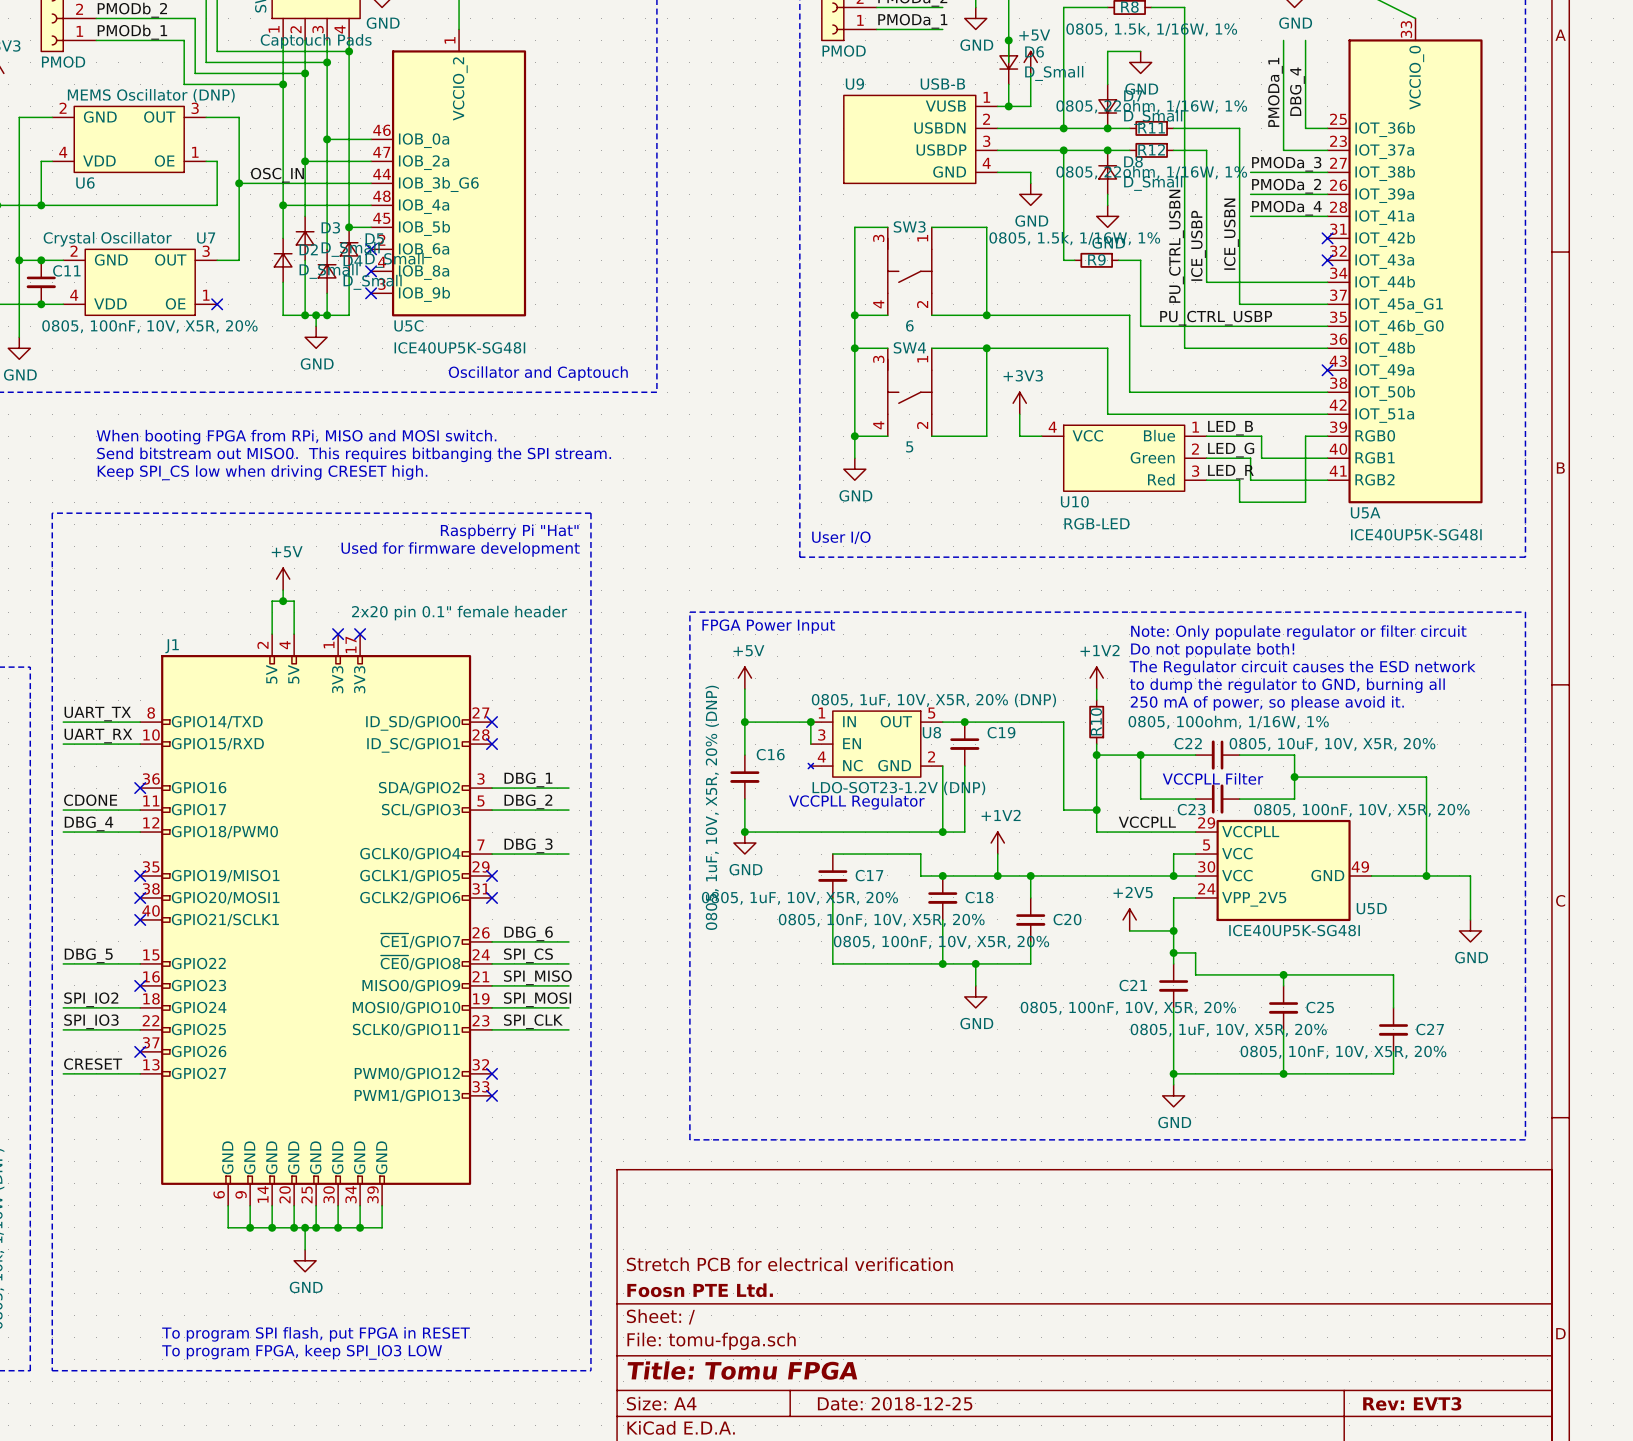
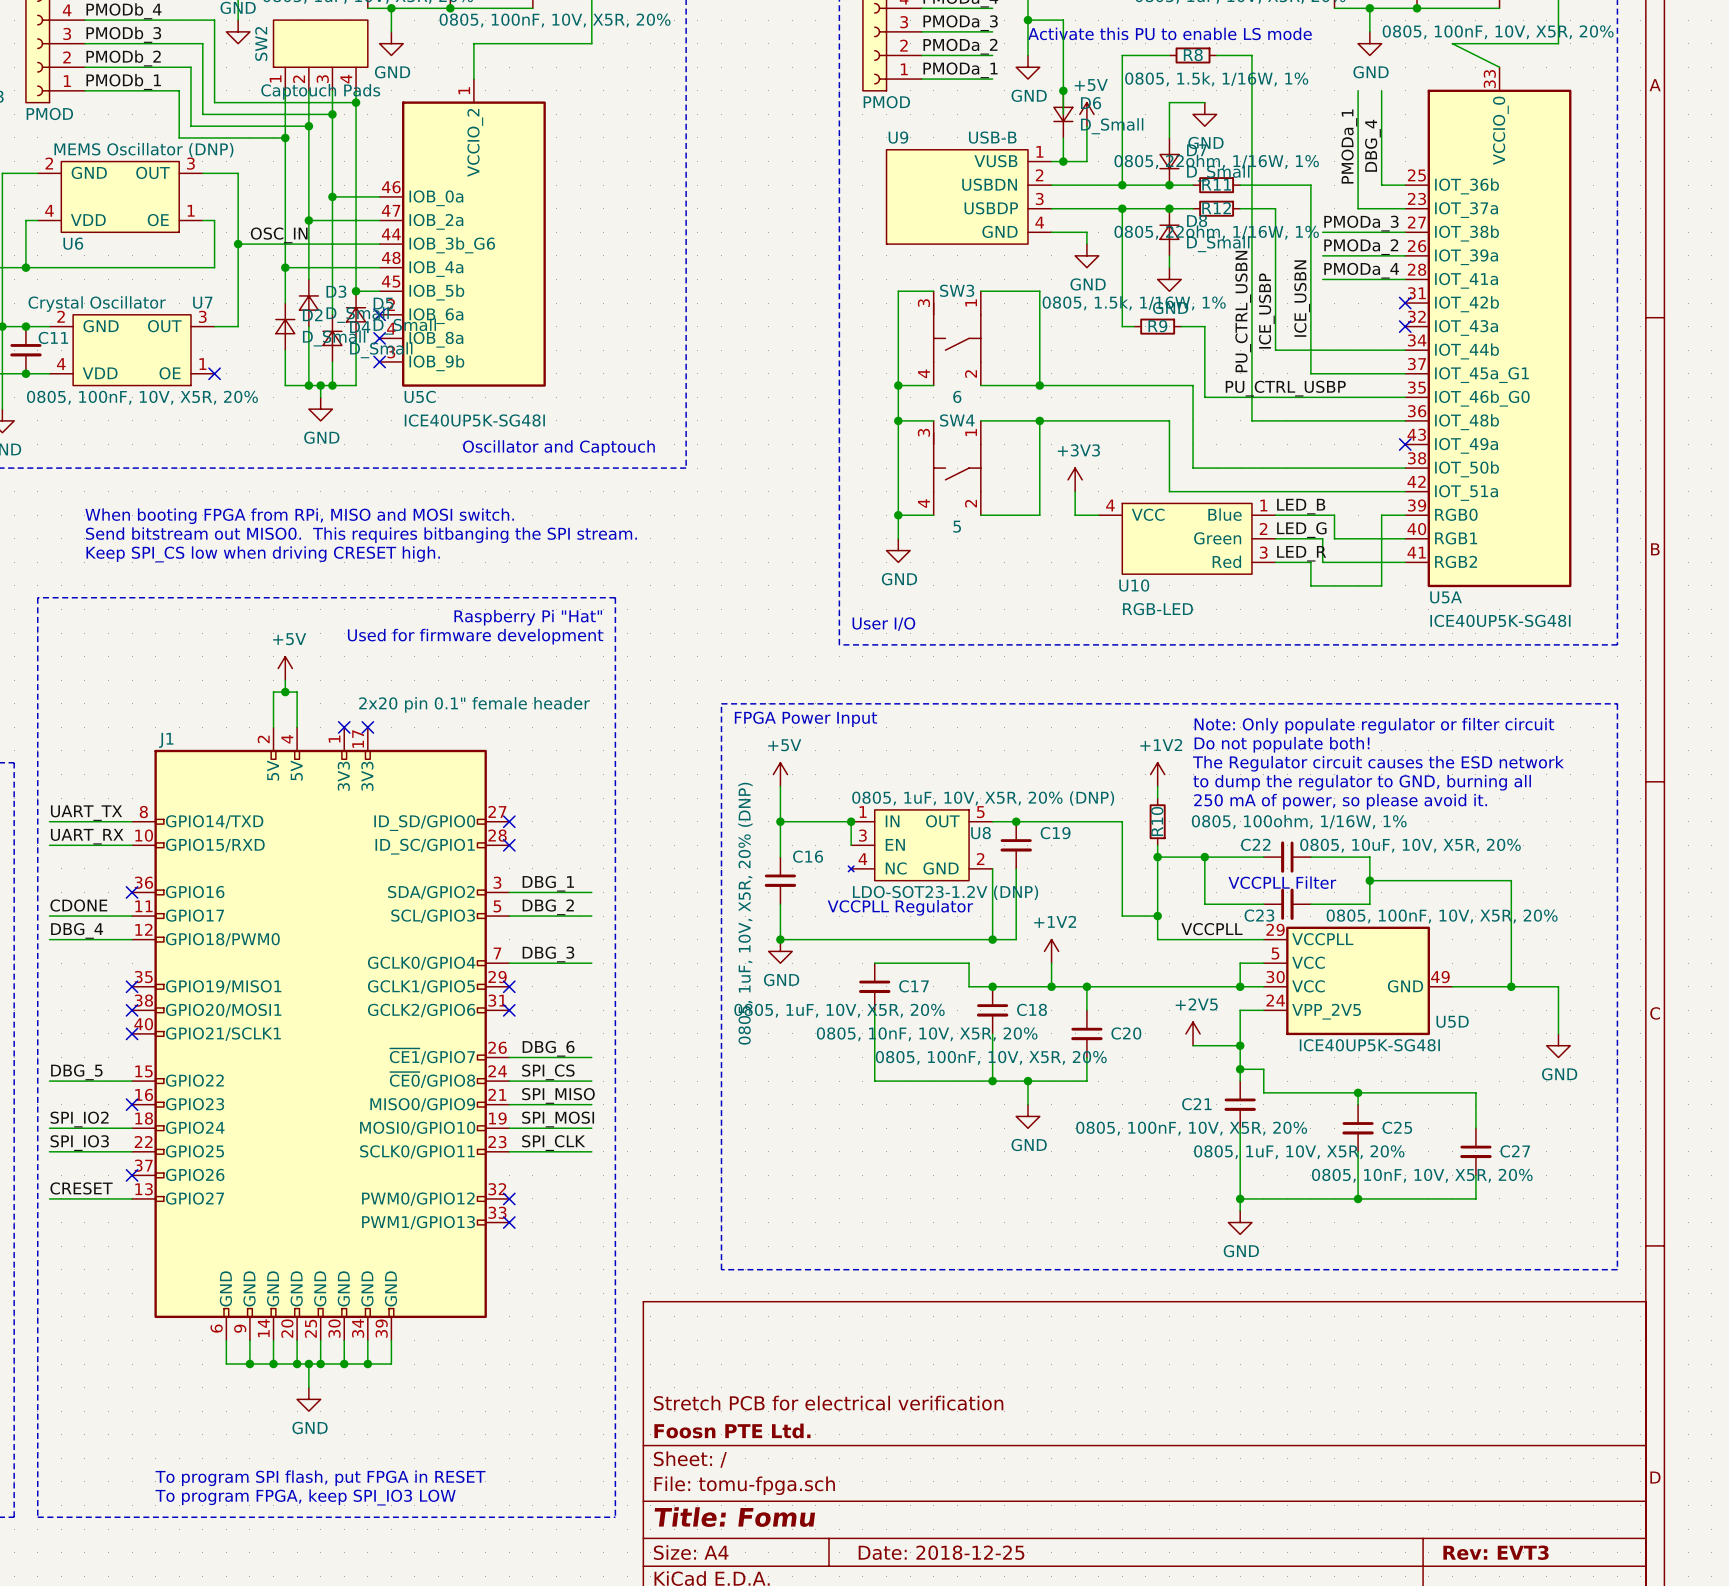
title block: Title: Tomu FPGA (742, 1370) -> Title: Fomu (734, 1517)

